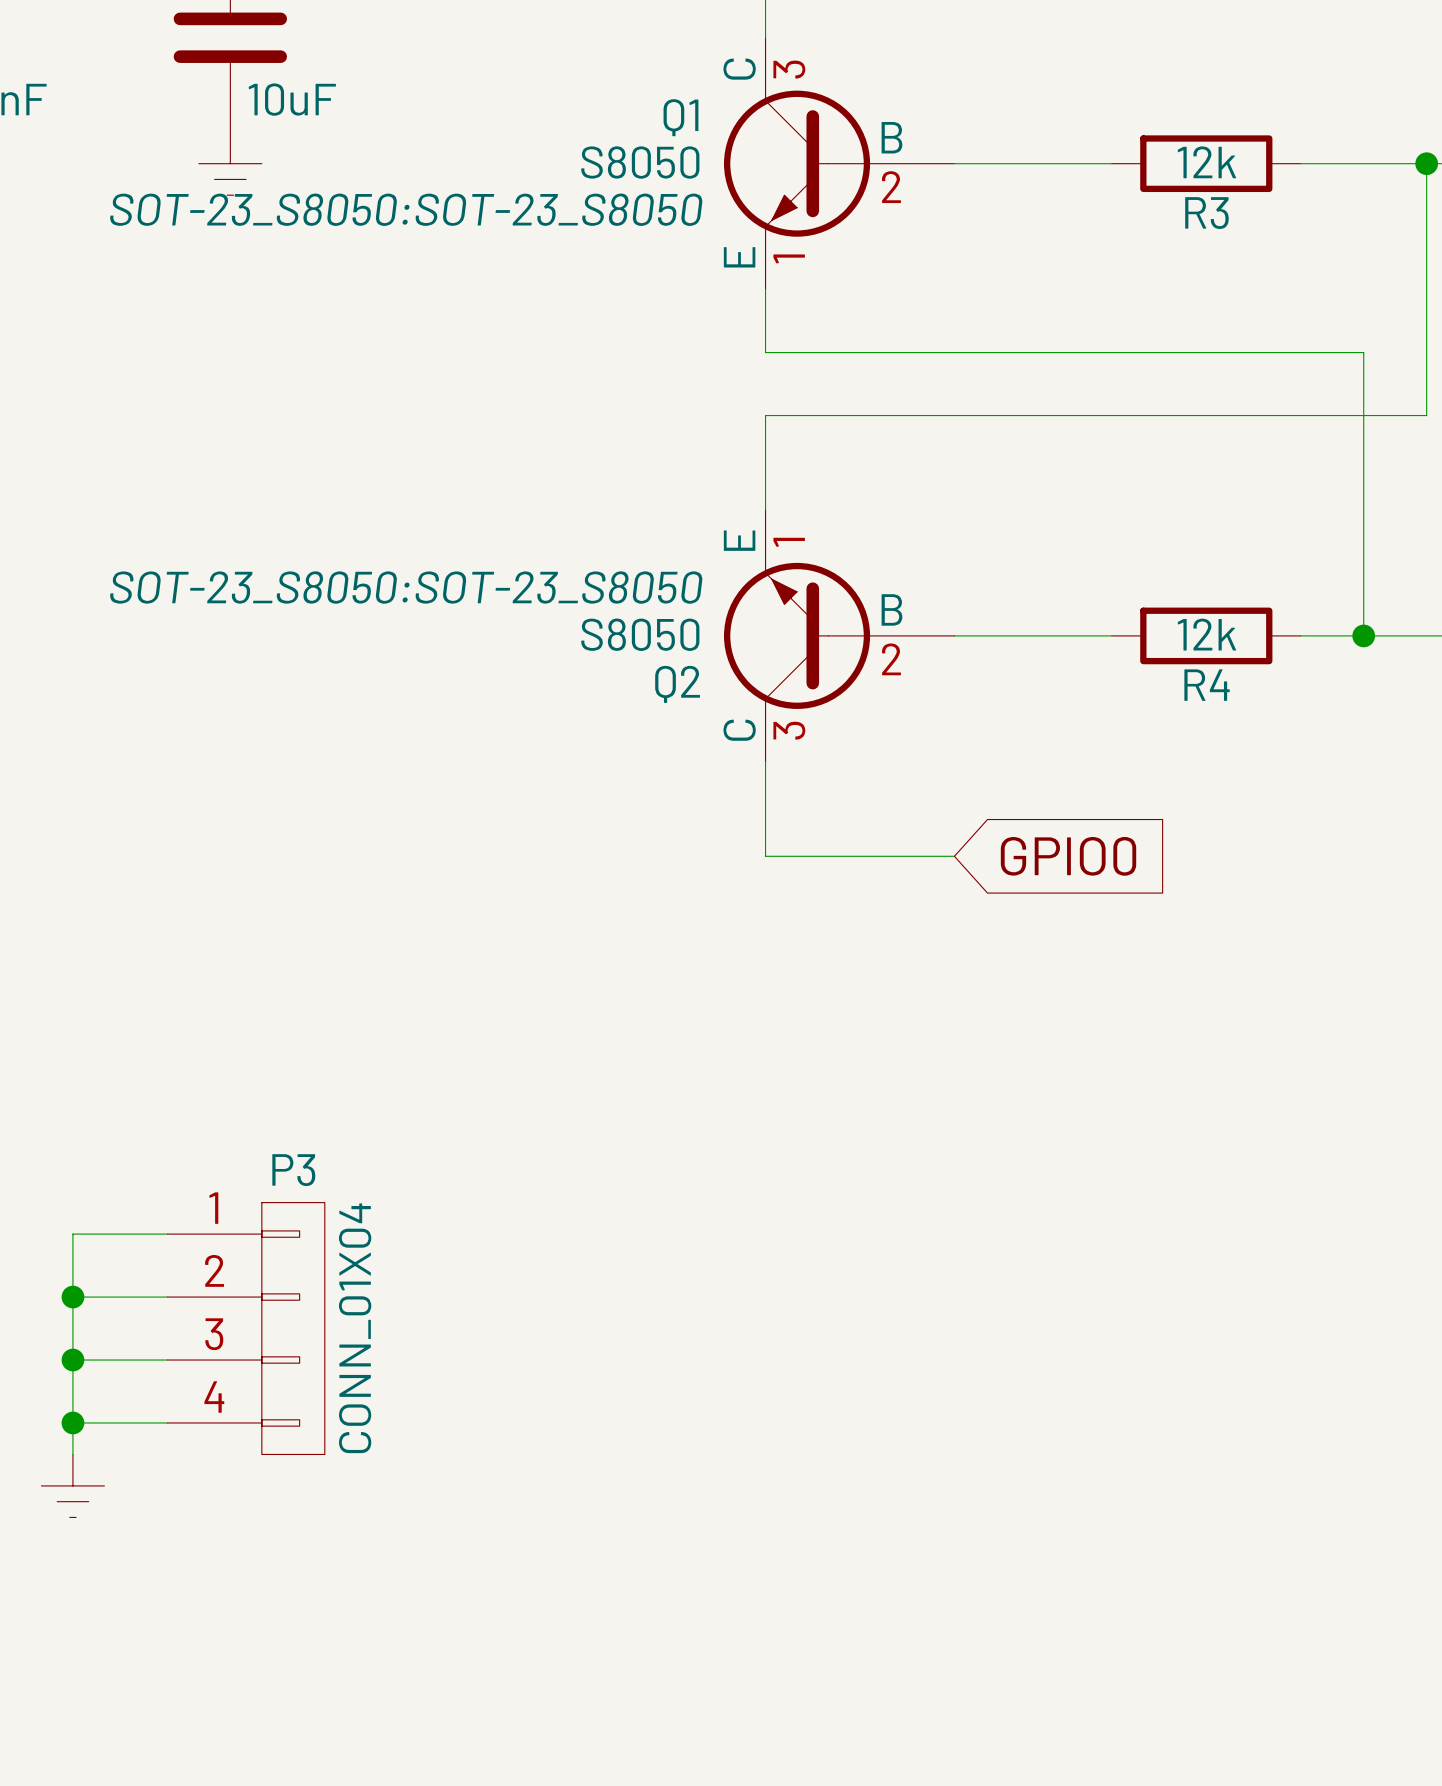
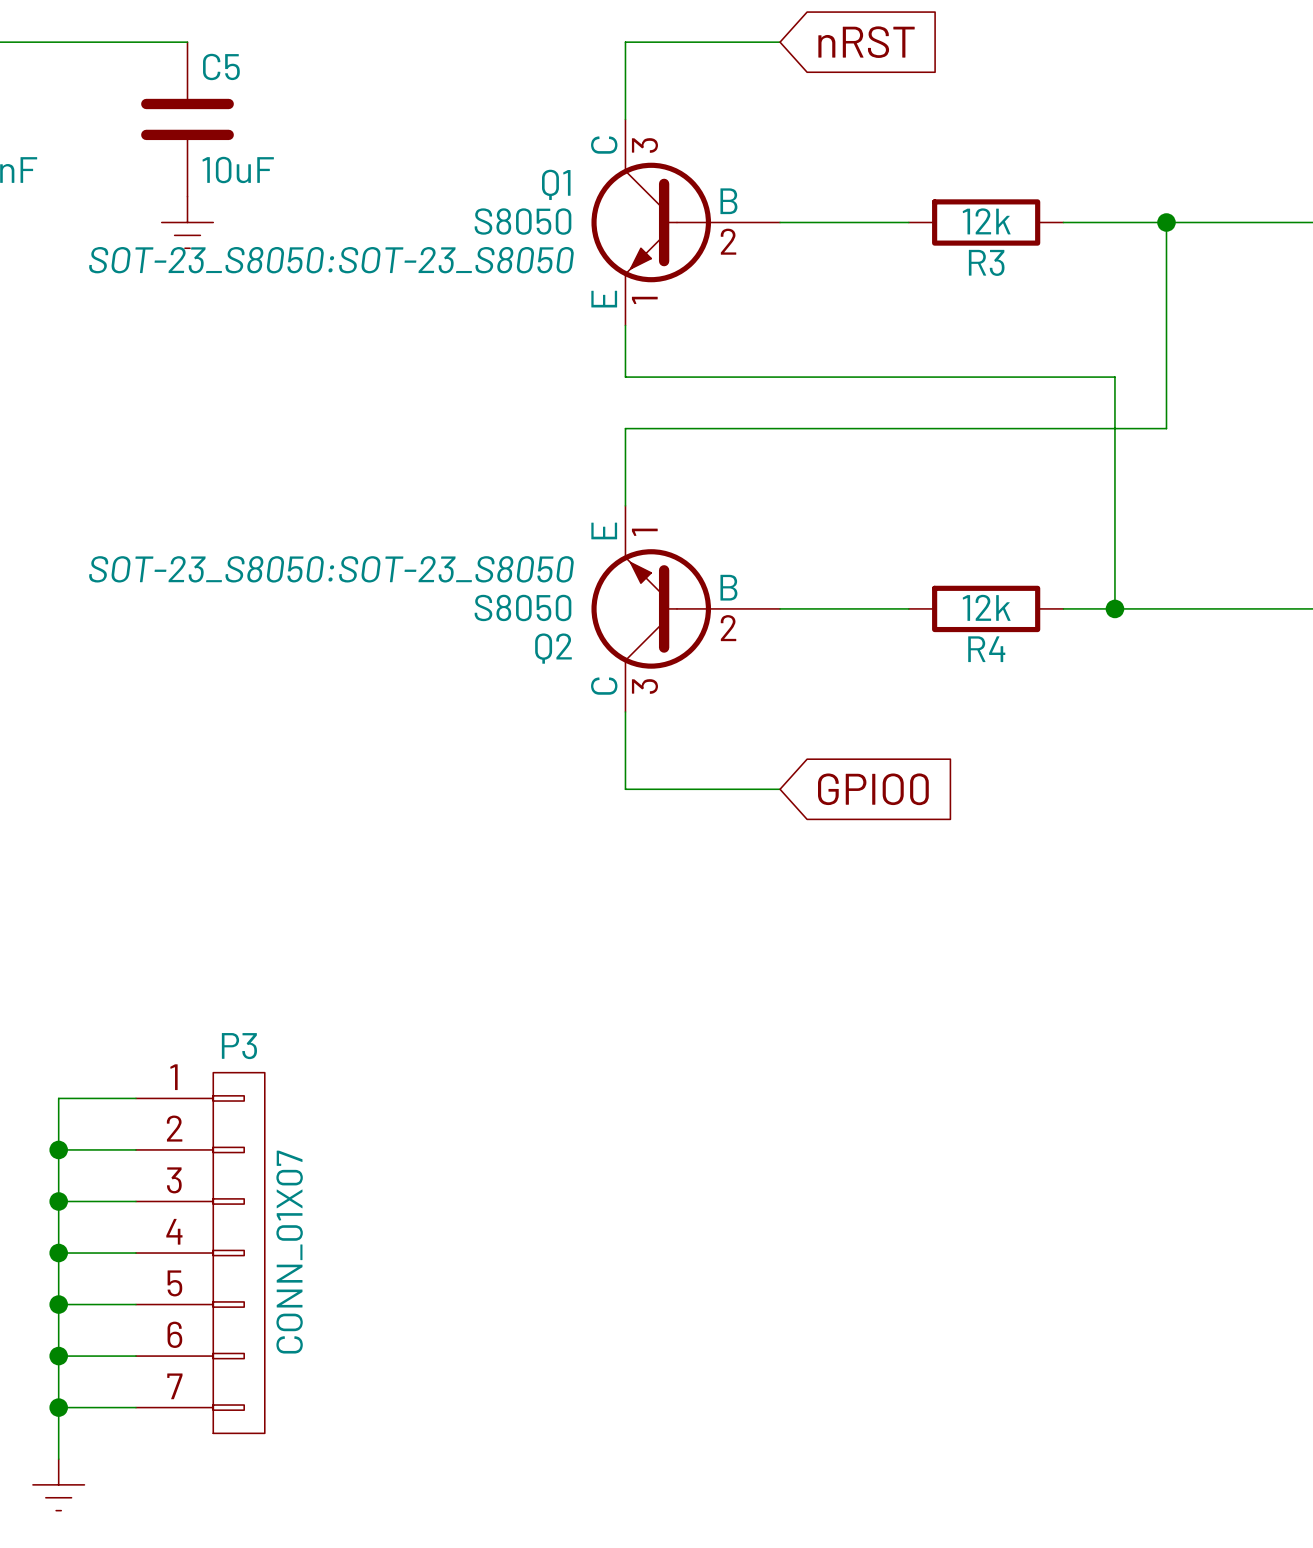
P3 symbol: [167, 1202, 325, 1455] -> [135, 1072, 265, 1434]
P3 value: CONN_01X04 (355, 1328) -> CONN_01X07 (289, 1252)
wire: none -> (58, 1278) (58, 1459)
wire: none -> (58, 1304) (135, 1304)
power symbol position: (72, 1485) -> (58, 1484)
junction: none -> (58, 1304)
wire: none -> (58, 1356) (135, 1356)
junction: none -> (58, 1356)
wire: none -> (58, 1407) (135, 1407)
junction: none -> (58, 1407)

